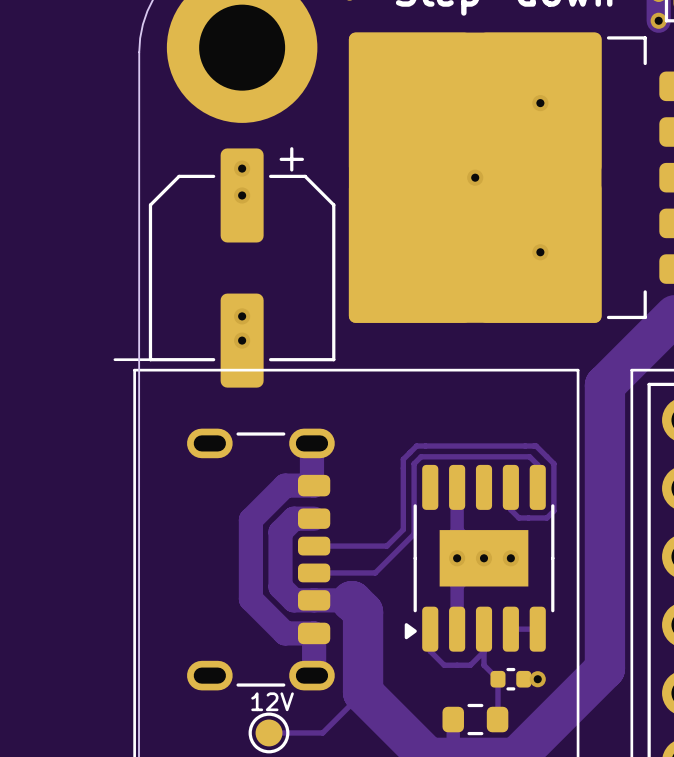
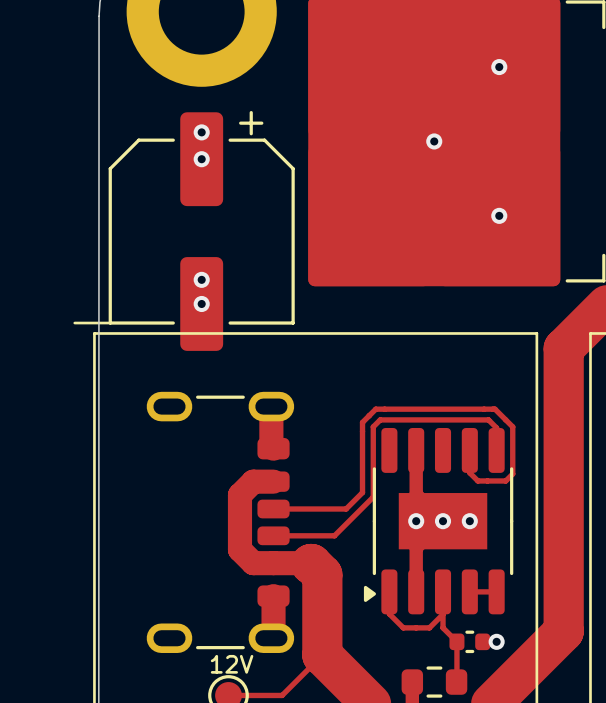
track: (314, 485) (285, 485) (250, 519) (250, 599) (285, 633) (314, 633) -> none

